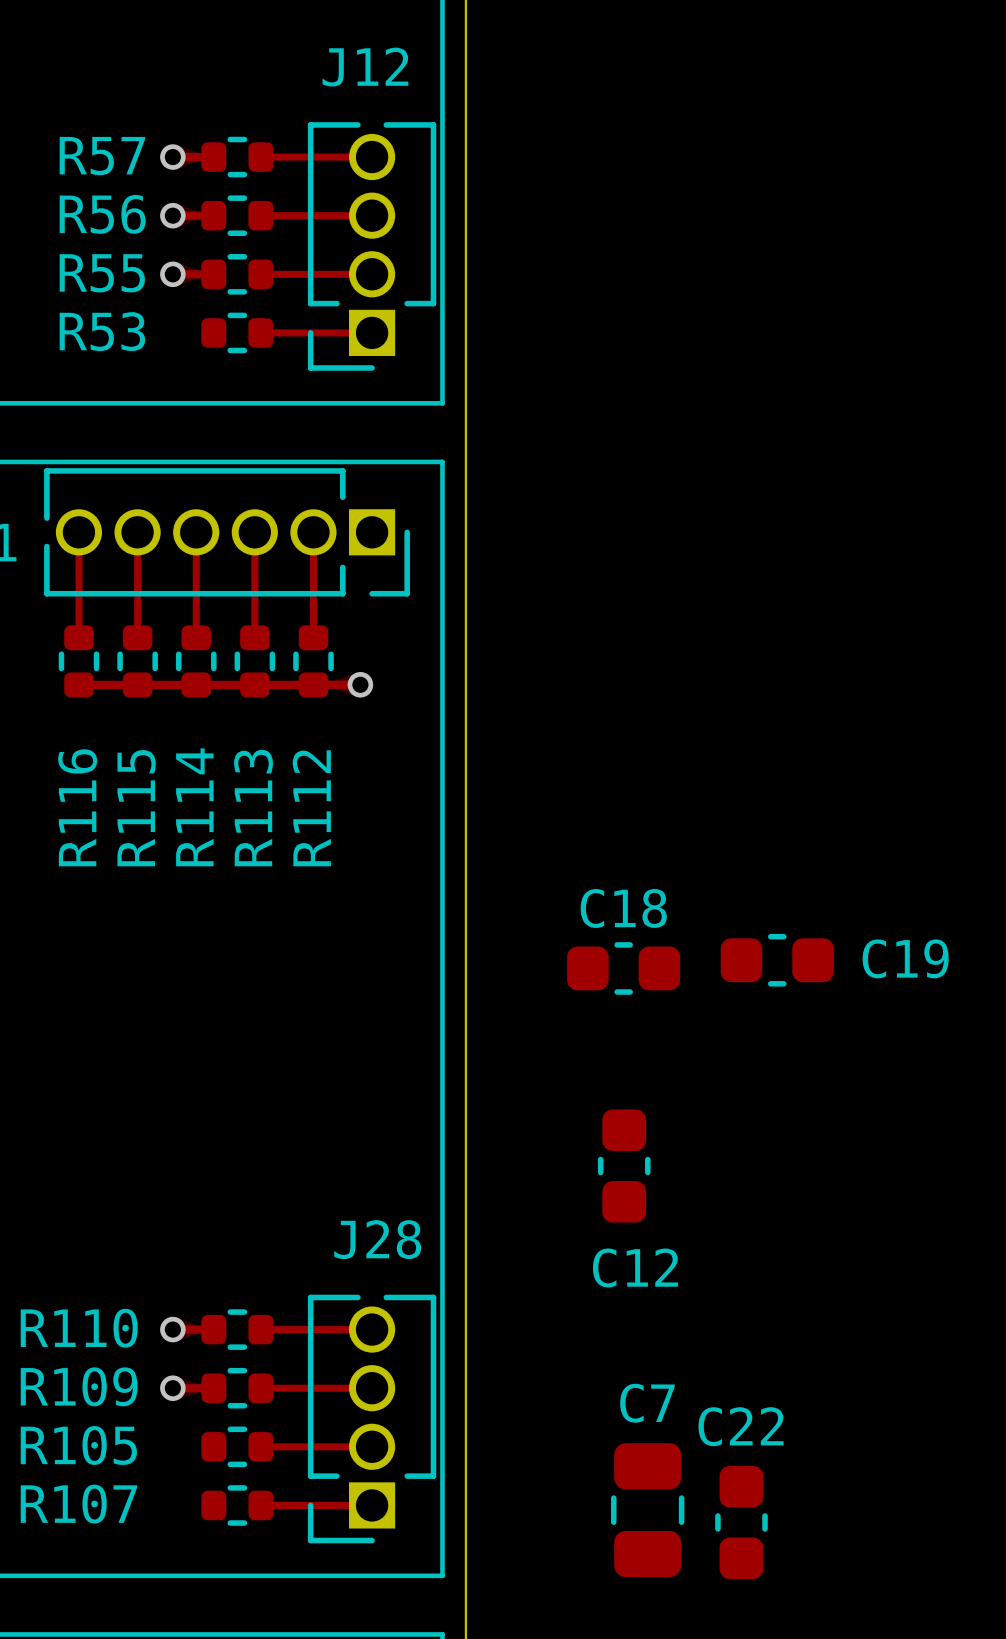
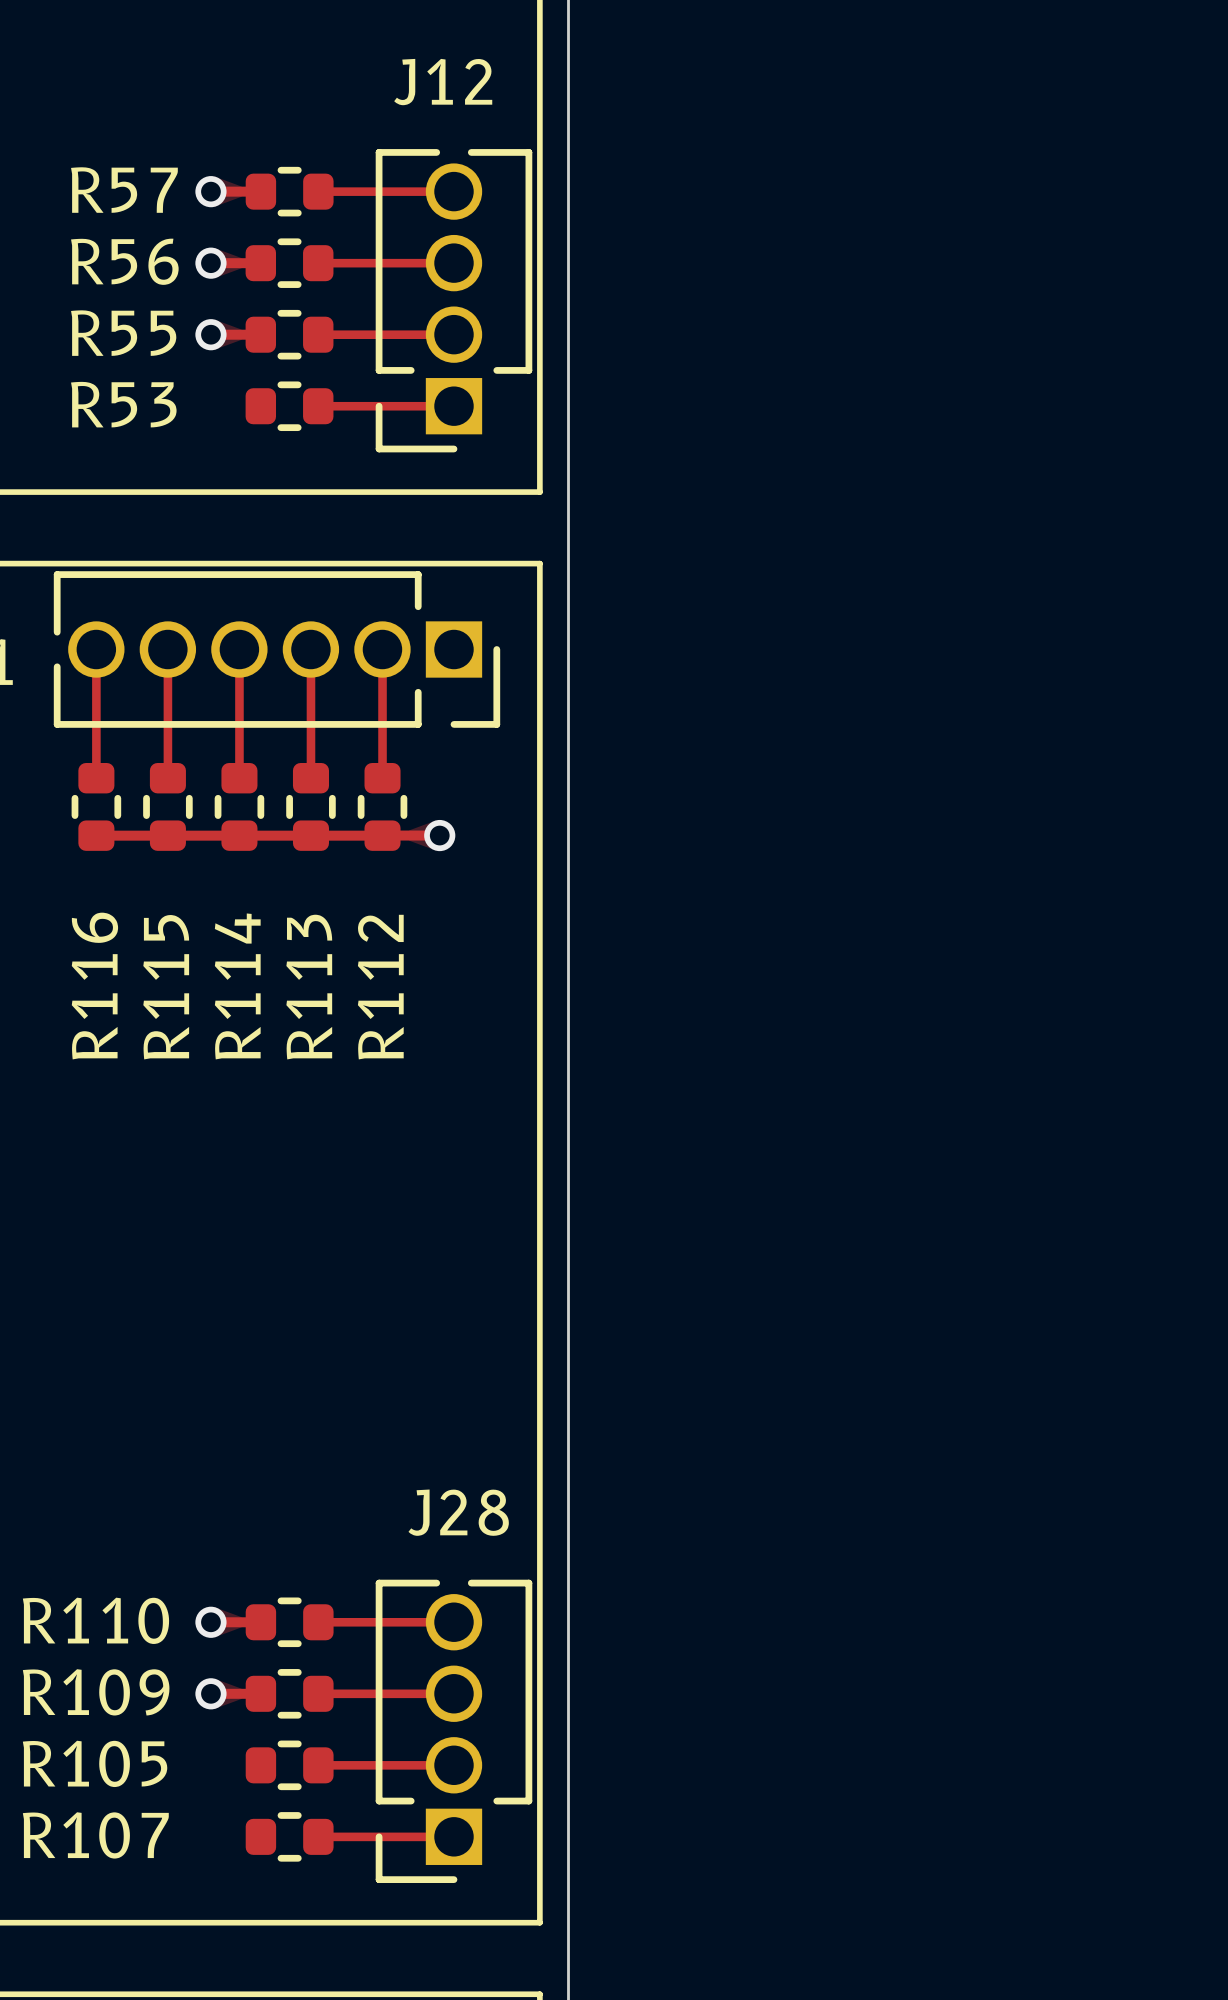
C19: (777, 960) -> none
C18: (623, 968) -> none
C12: (624, 1166) -> none
C7: (647, 1510) -> none
C22: (741, 1522) -> none

